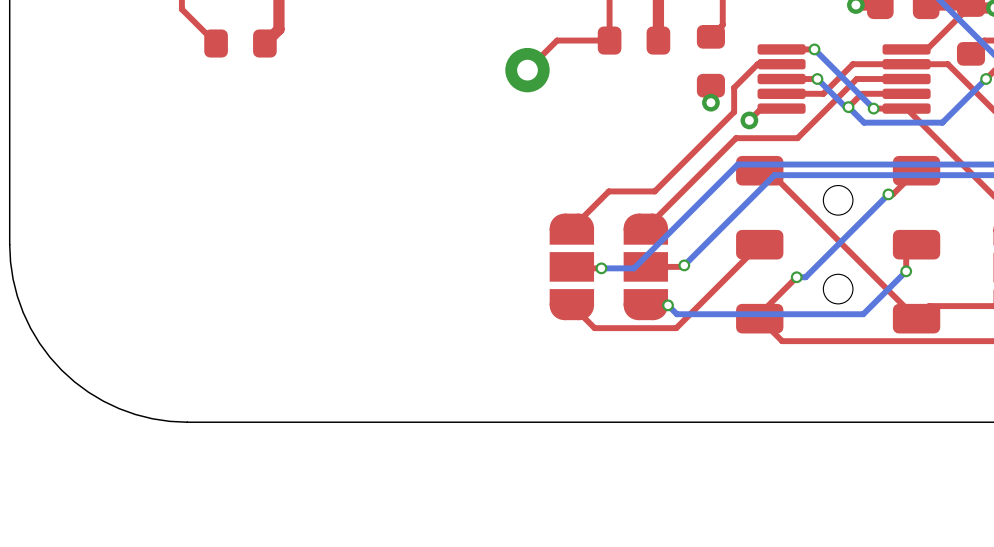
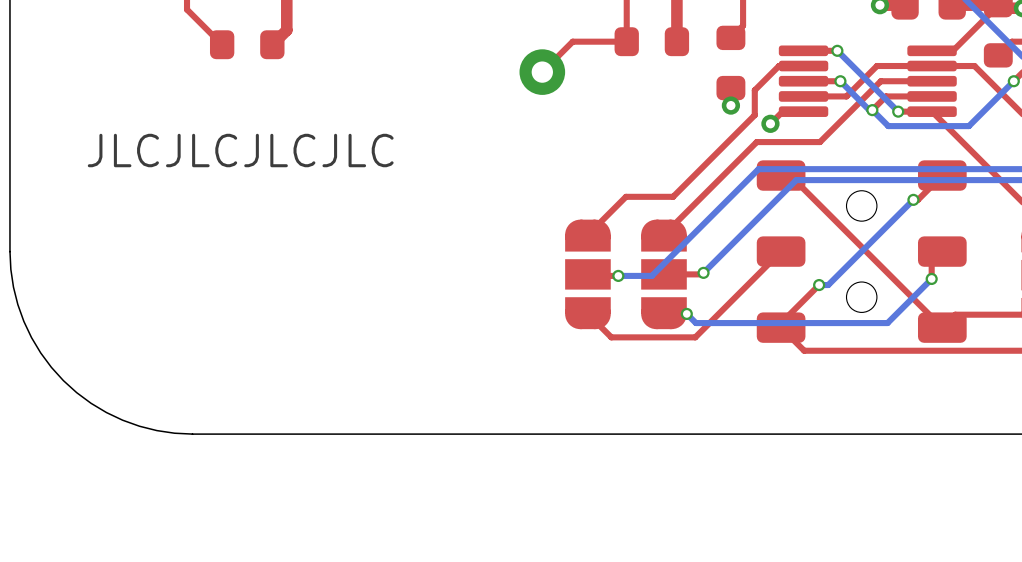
text: none -> JLCJLCJLCJLC (240, 150)

